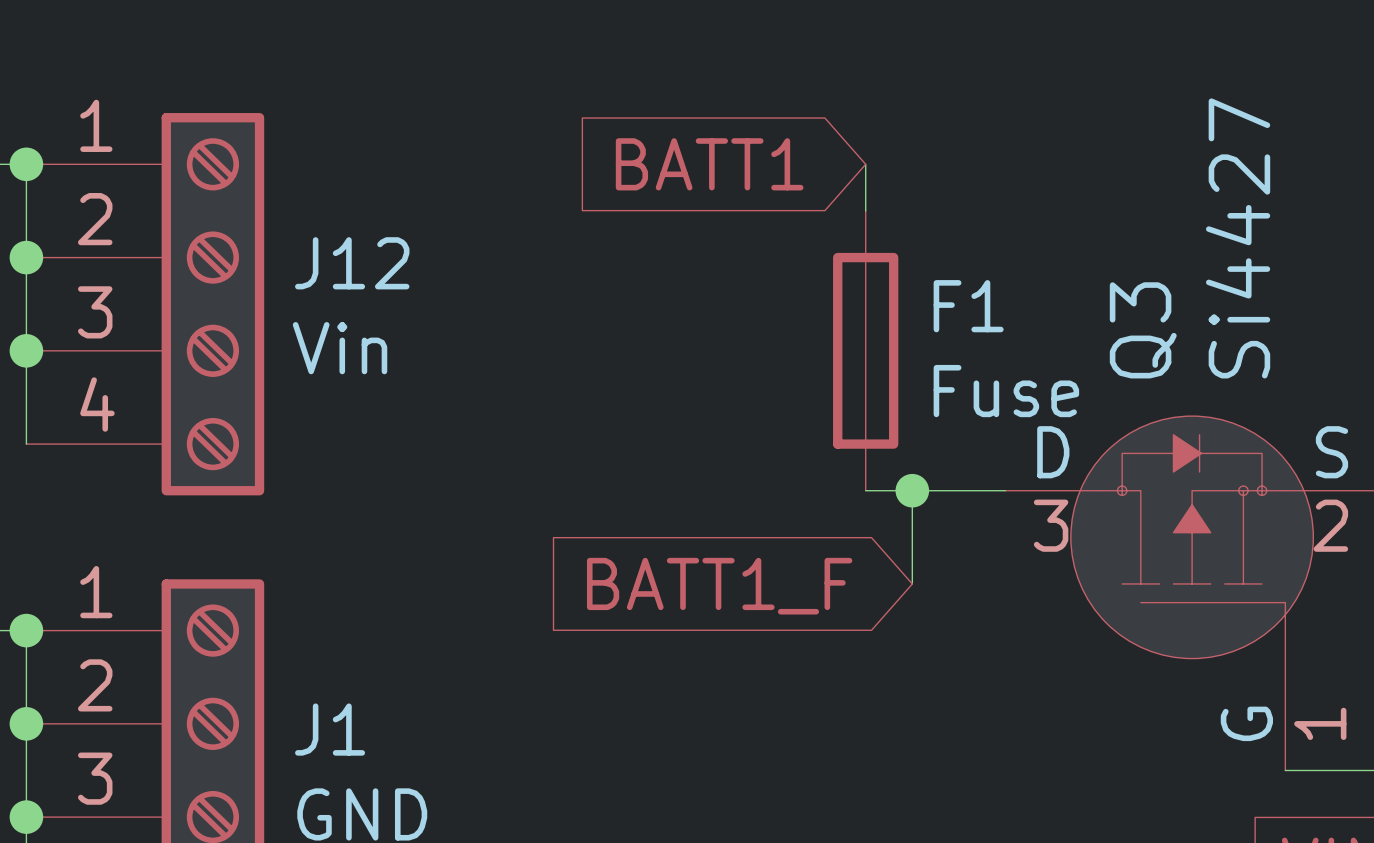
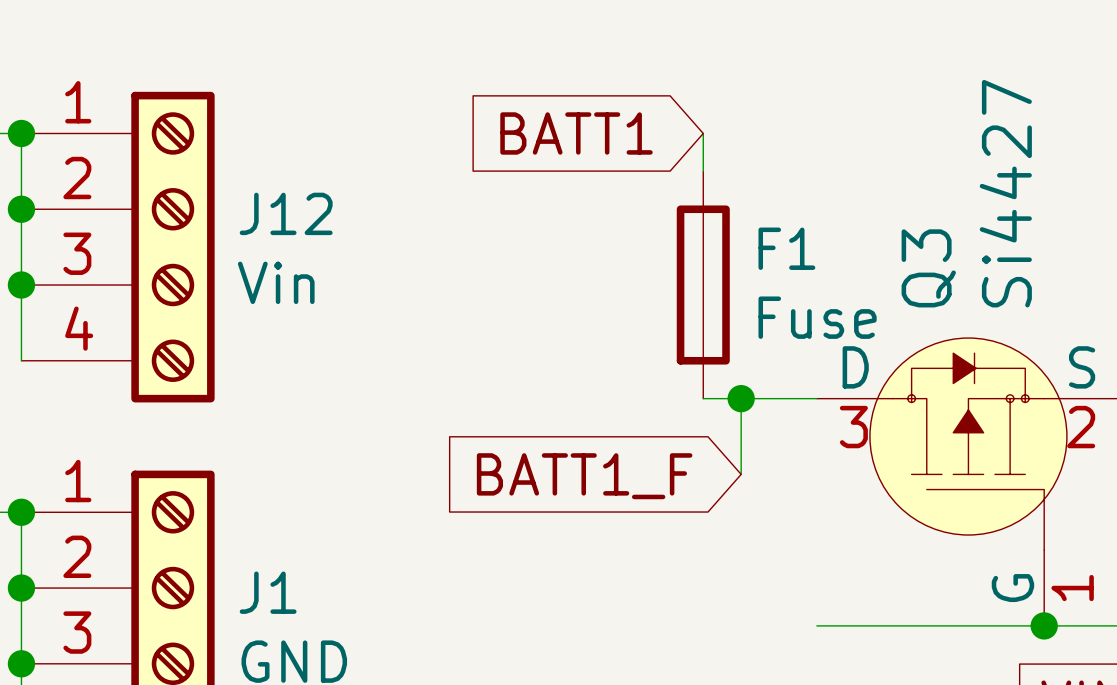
wire: none -> (816, 625) (1044, 625)
junction: none -> (1044, 625)

